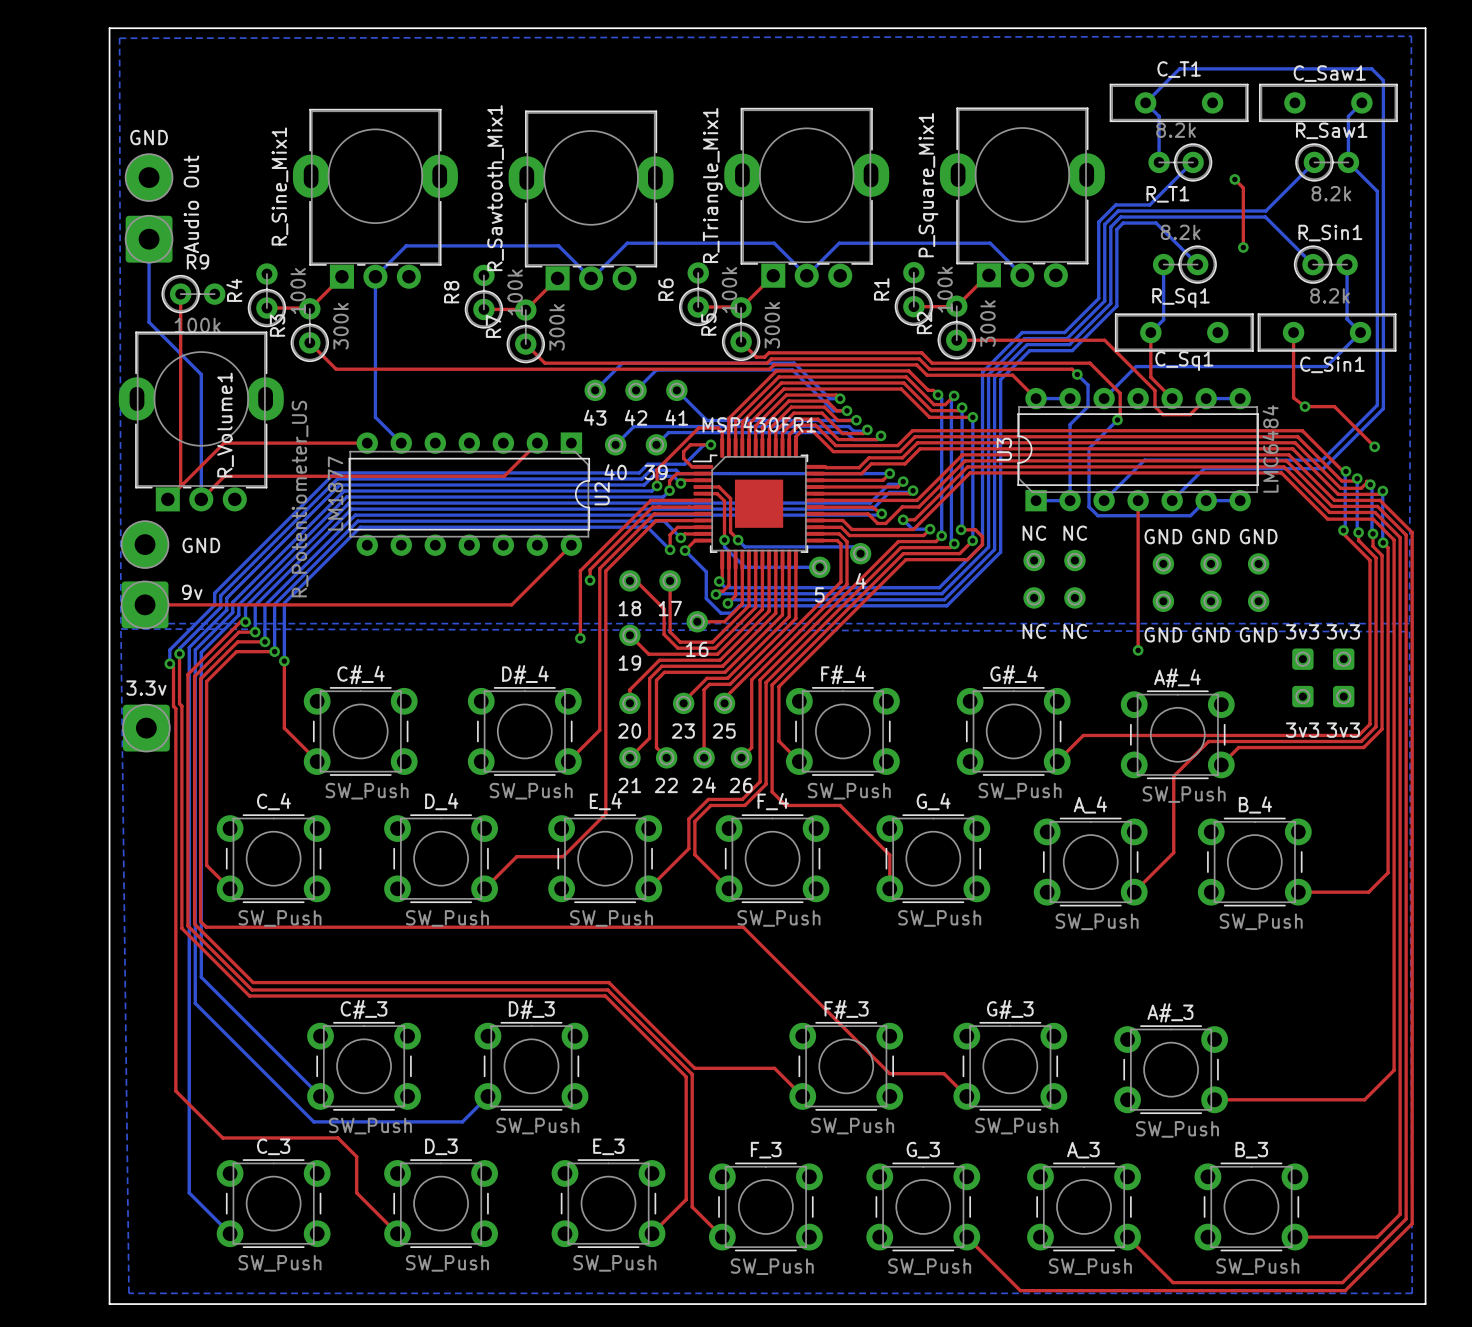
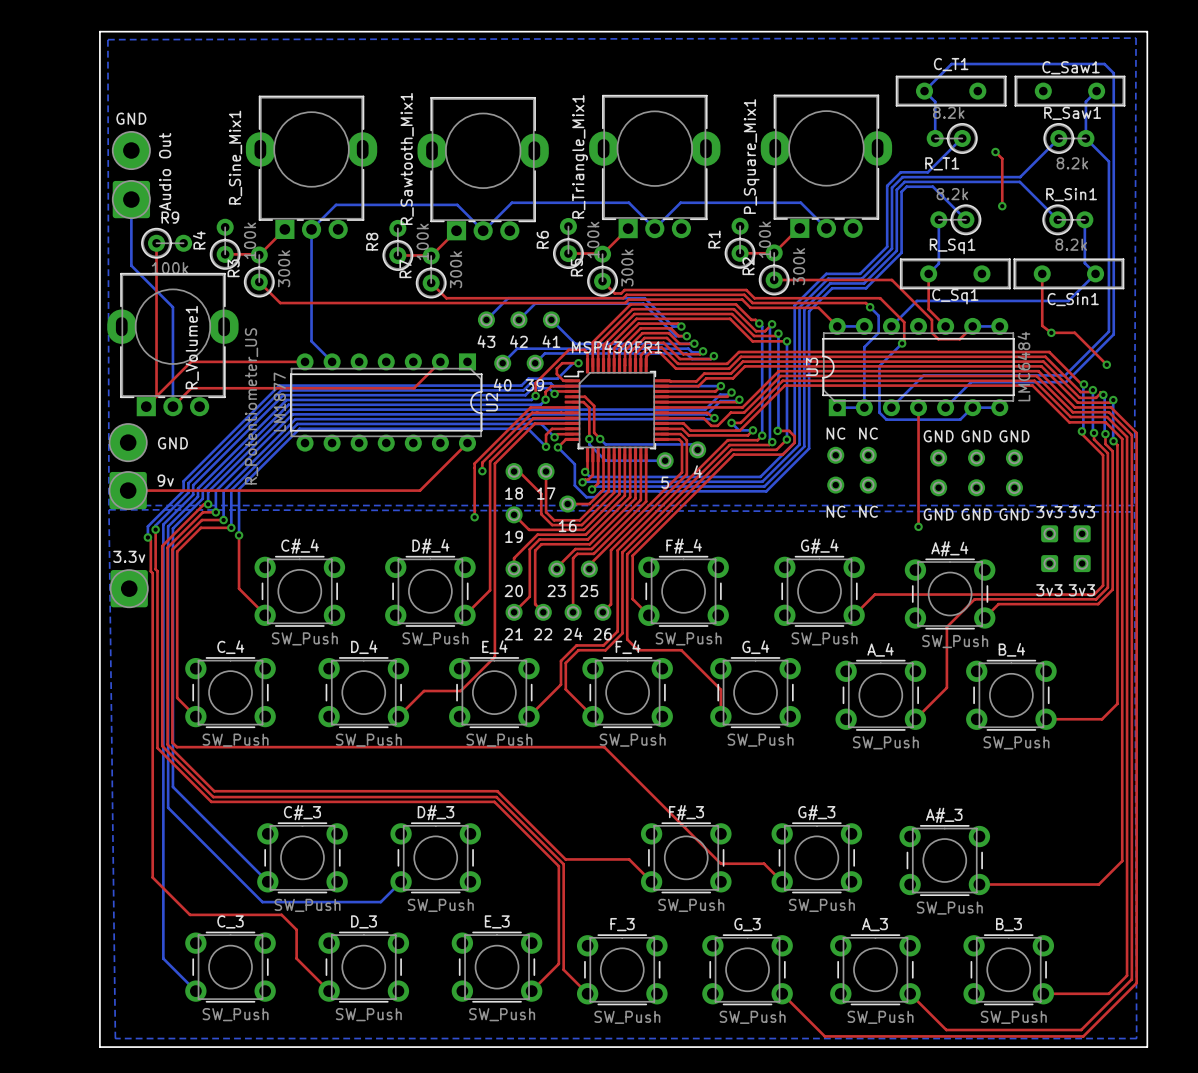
MSP430FR1 footprint: [692, 438, 825, 570] -> [563, 357, 670, 463]

